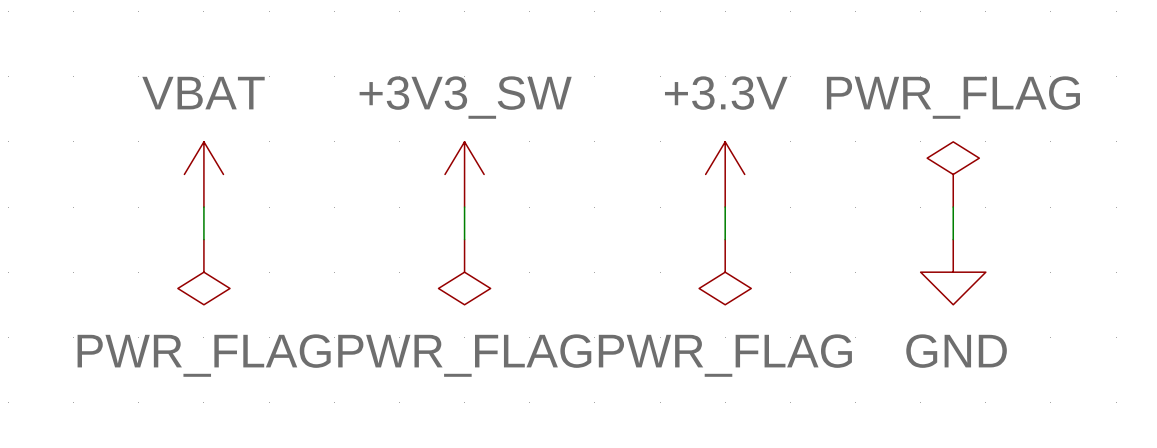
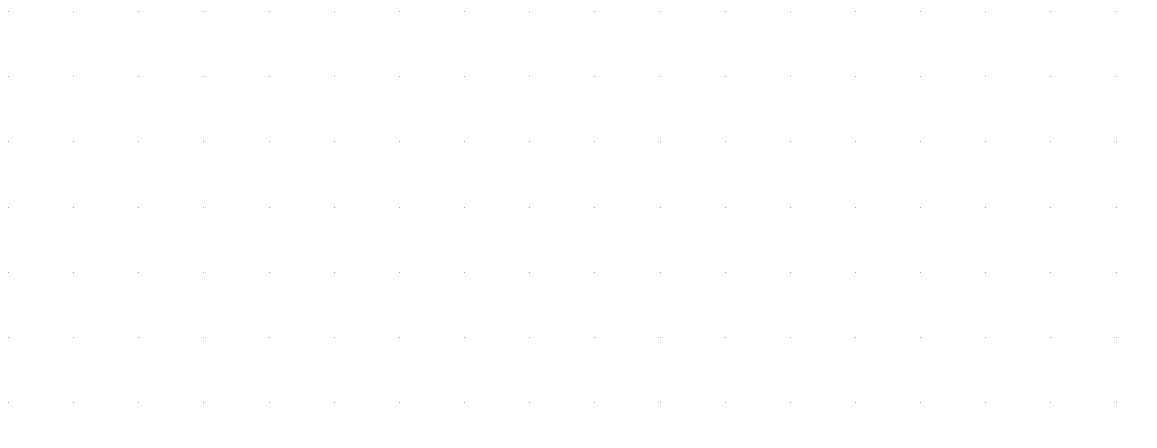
power symbol: VBAT (203, 174) -> none
power symbol: +3V3_SW (464, 174) -> none
power symbol: +3.3V (725, 174) -> none
power symbol: PWR_FLAG (953, 174) -> none
wire: (203, 207) (203, 239) -> none
wire: (464, 207) (464, 239) -> none
wire: (725, 207) (725, 239) -> none
wire: (953, 207) (953, 239) -> none
power symbol: PWR_FLAG (203, 272) -> none
power symbol: PWR_FLAG (464, 272) -> none
power symbol: PWR_FLAG (725, 272) -> none
power symbol: GND (953, 272) -> none

